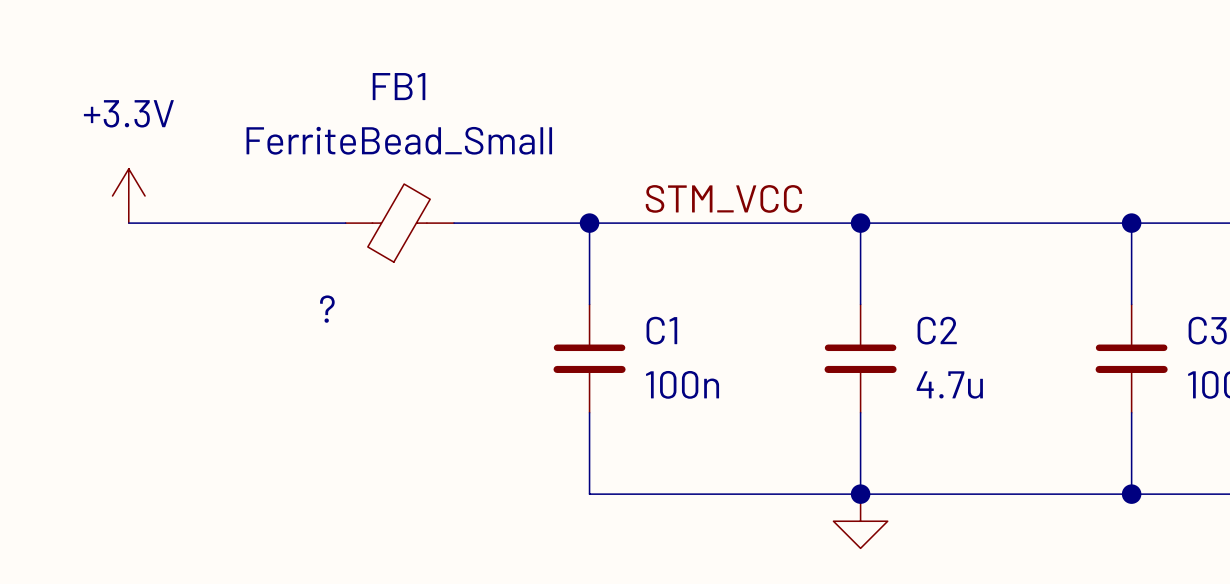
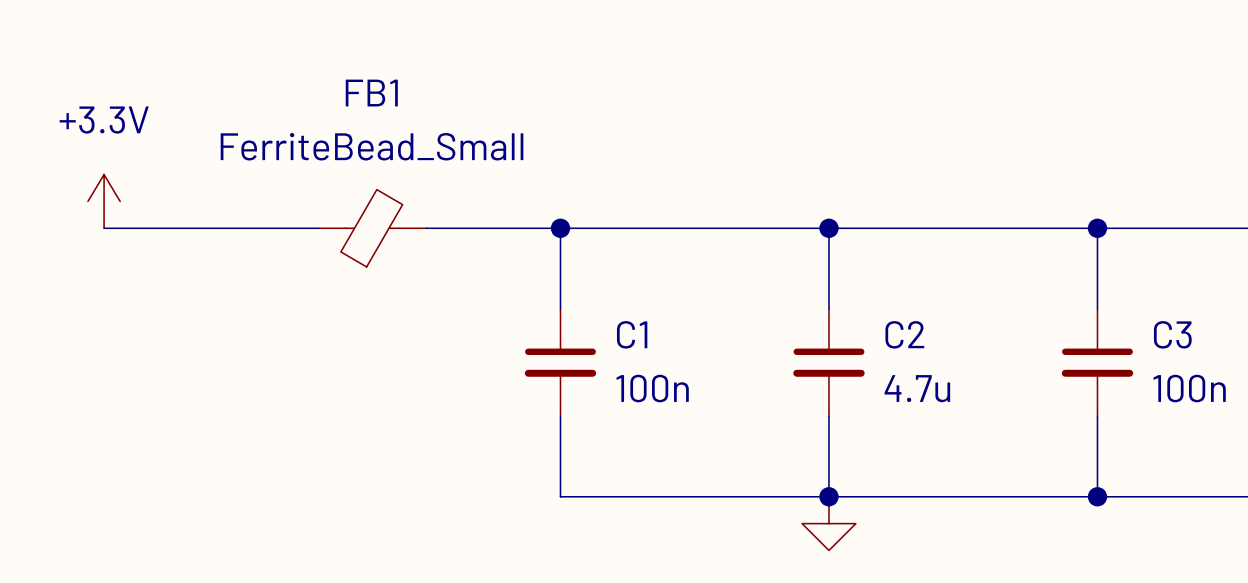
label: STM_VCC (723, 198) -> none
text: ? (327, 309) -> none

